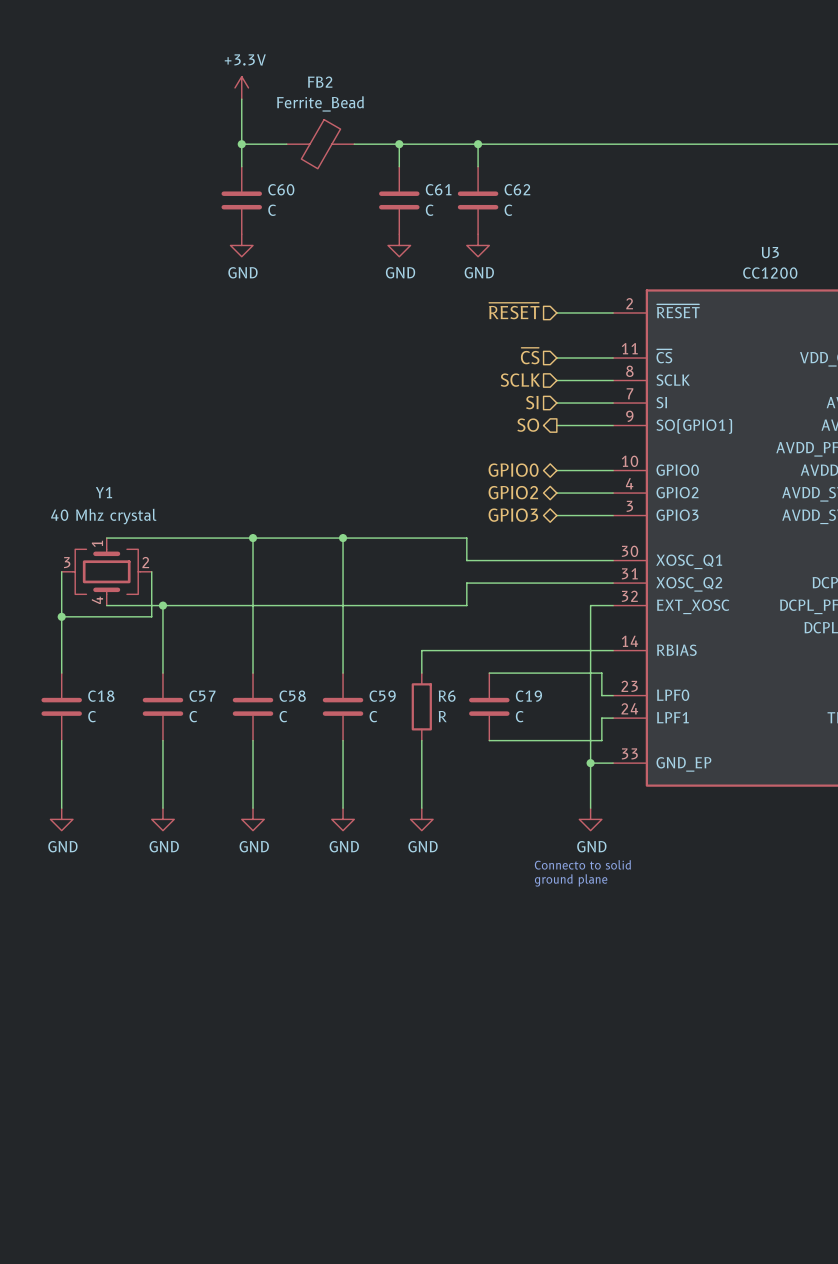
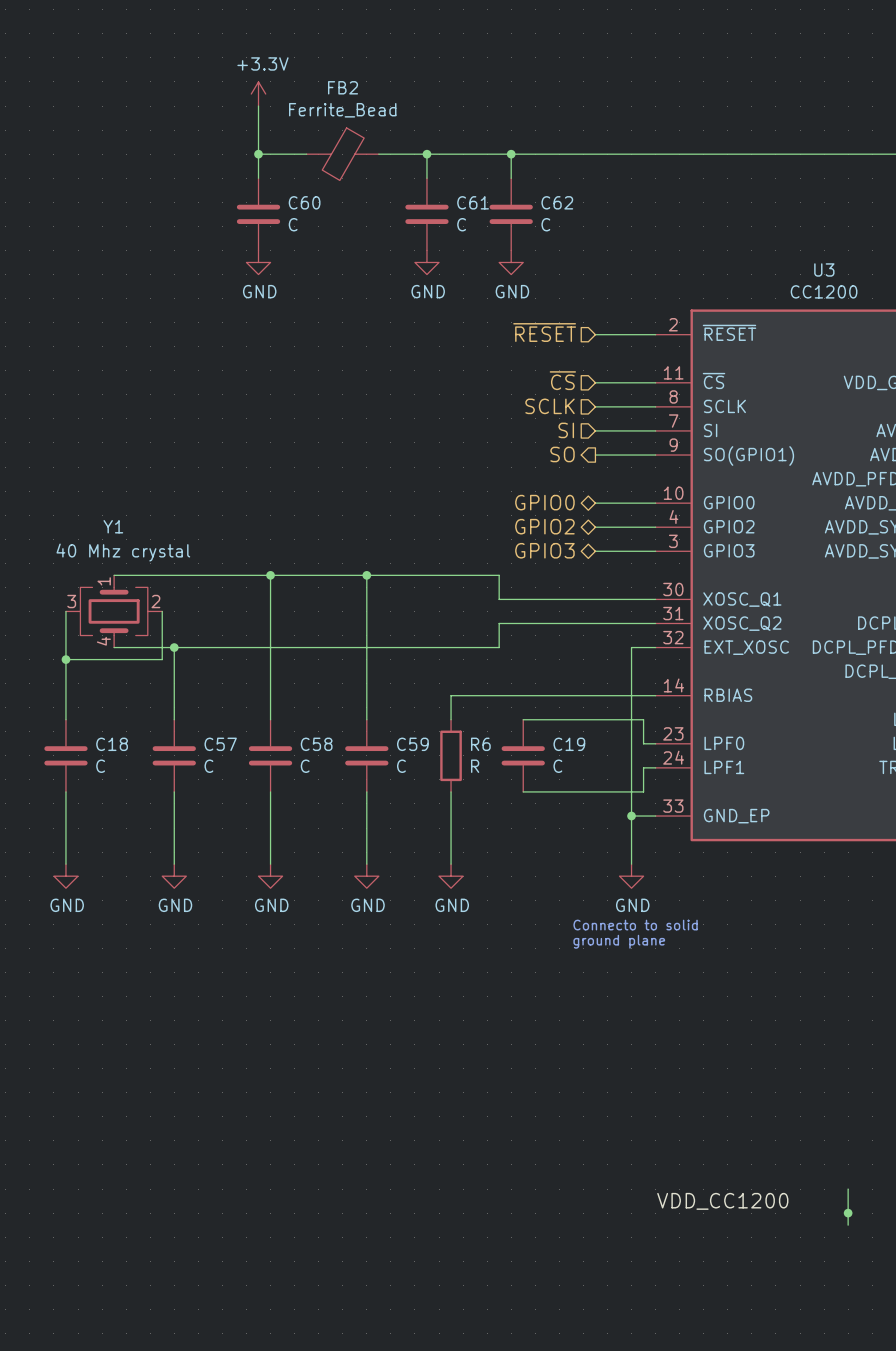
wire: none -> (848, 1189) (848, 1225)
label: none -> VDD_CC1200 (722, 1201)
junction: none -> (848, 1213)

